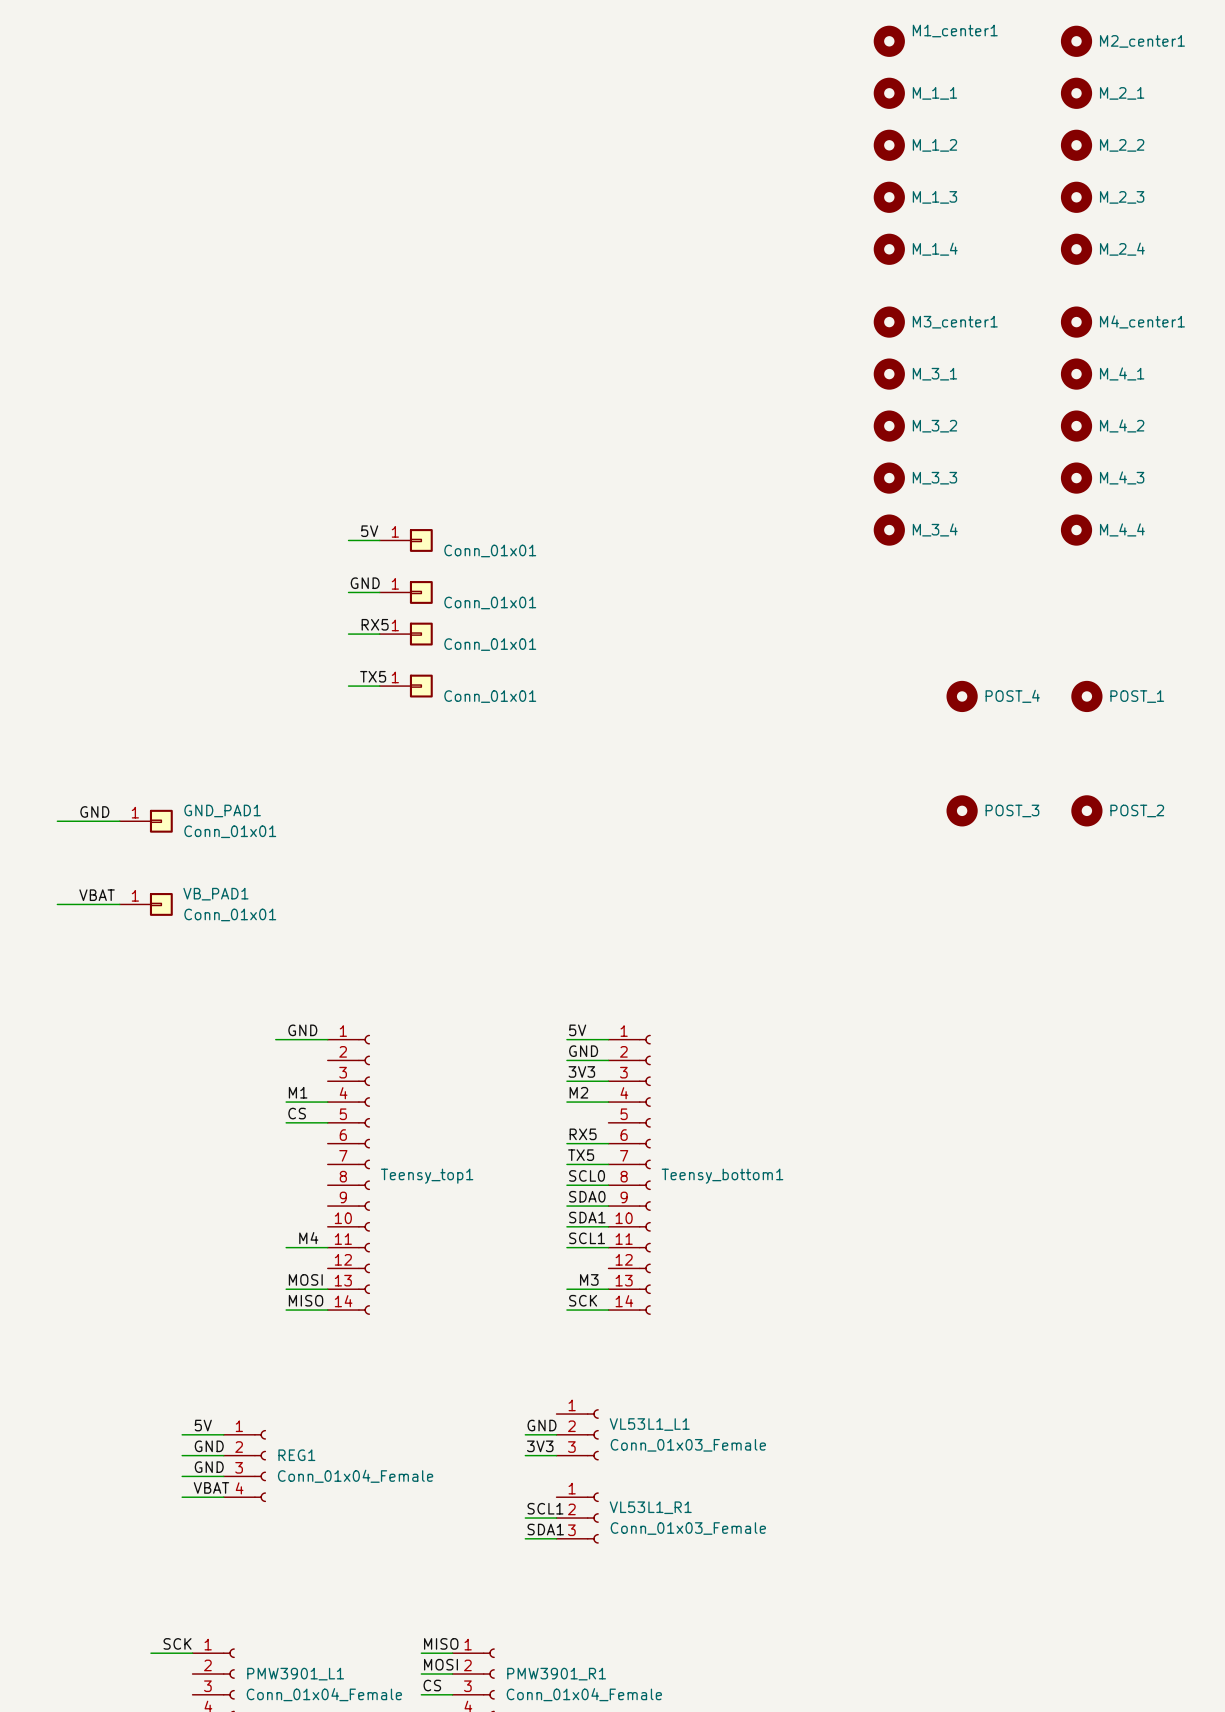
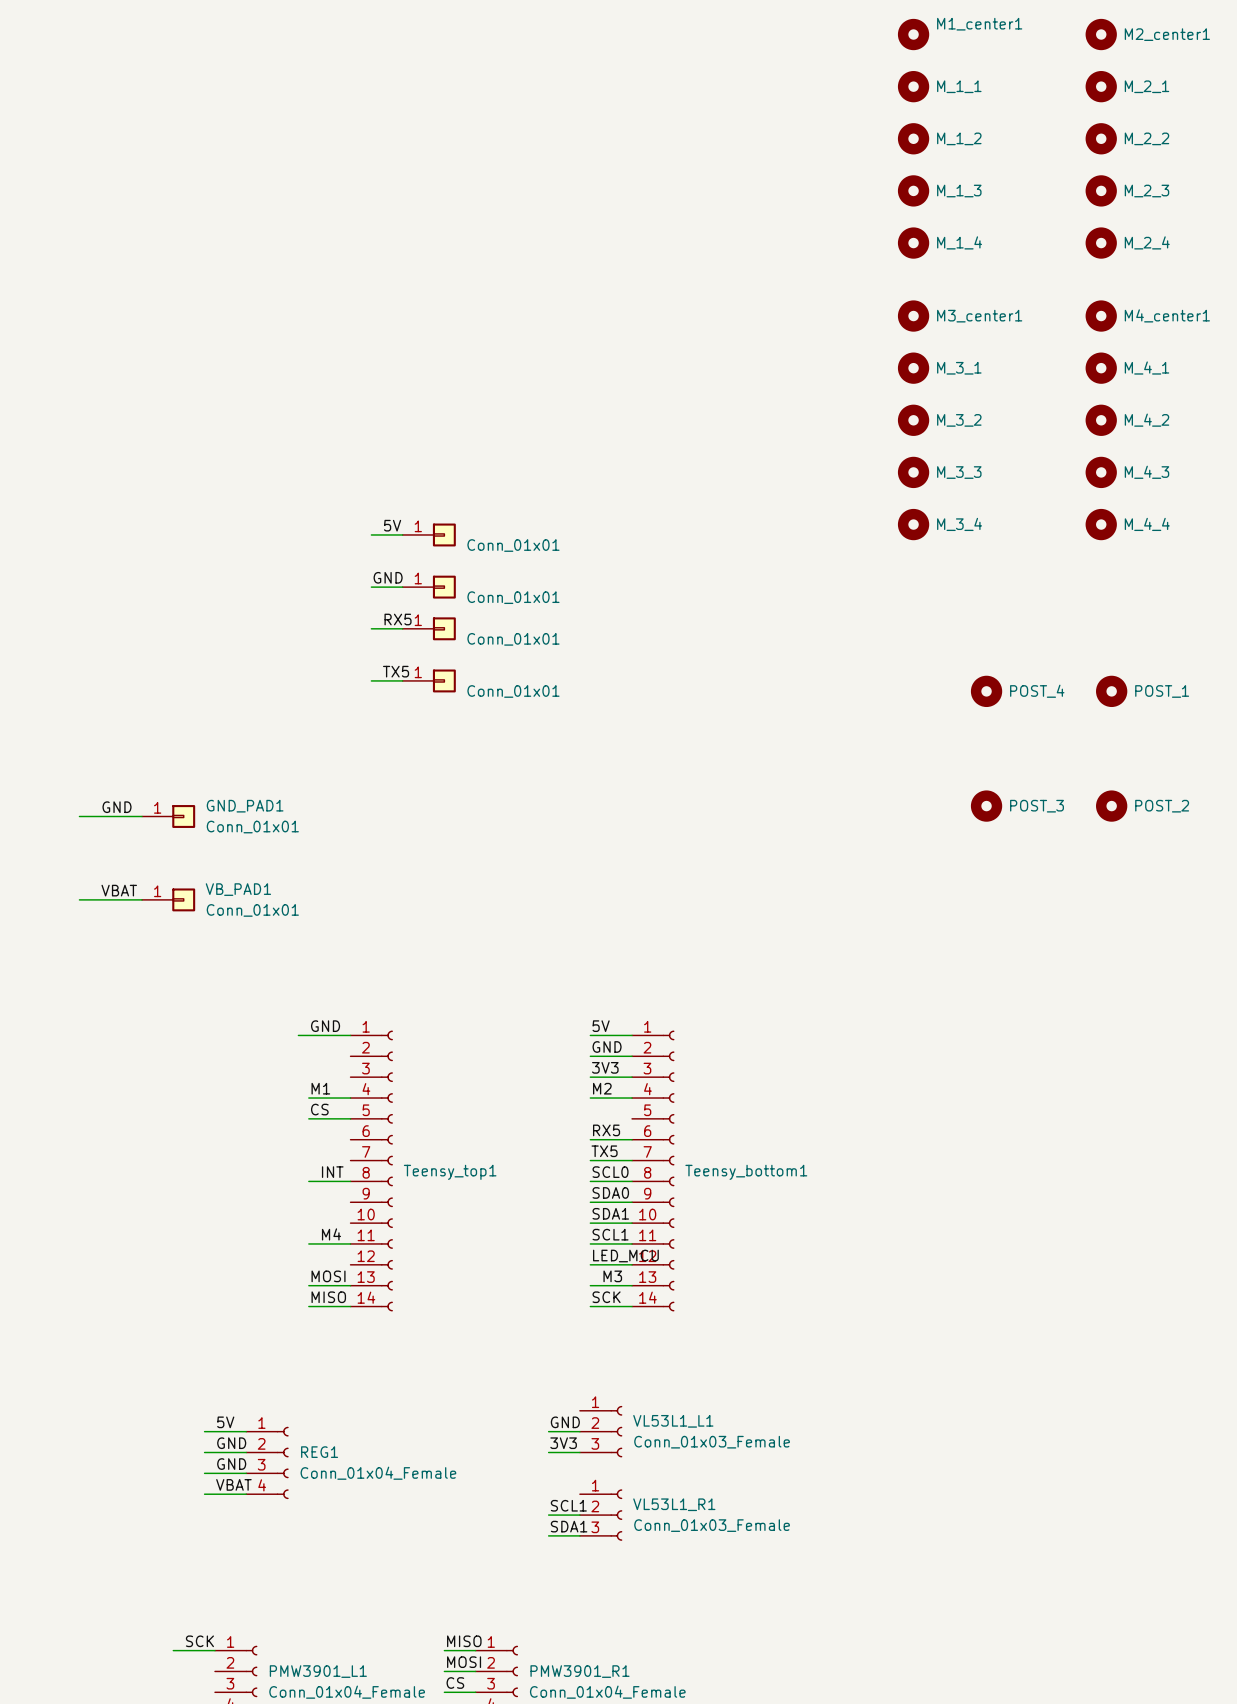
label: none -> INT (332, 1172)
wire: none -> (308, 1181) (350, 1181)
label: none -> LED_MCU (625, 1256)
wire: none -> (590, 1264) (632, 1264)

